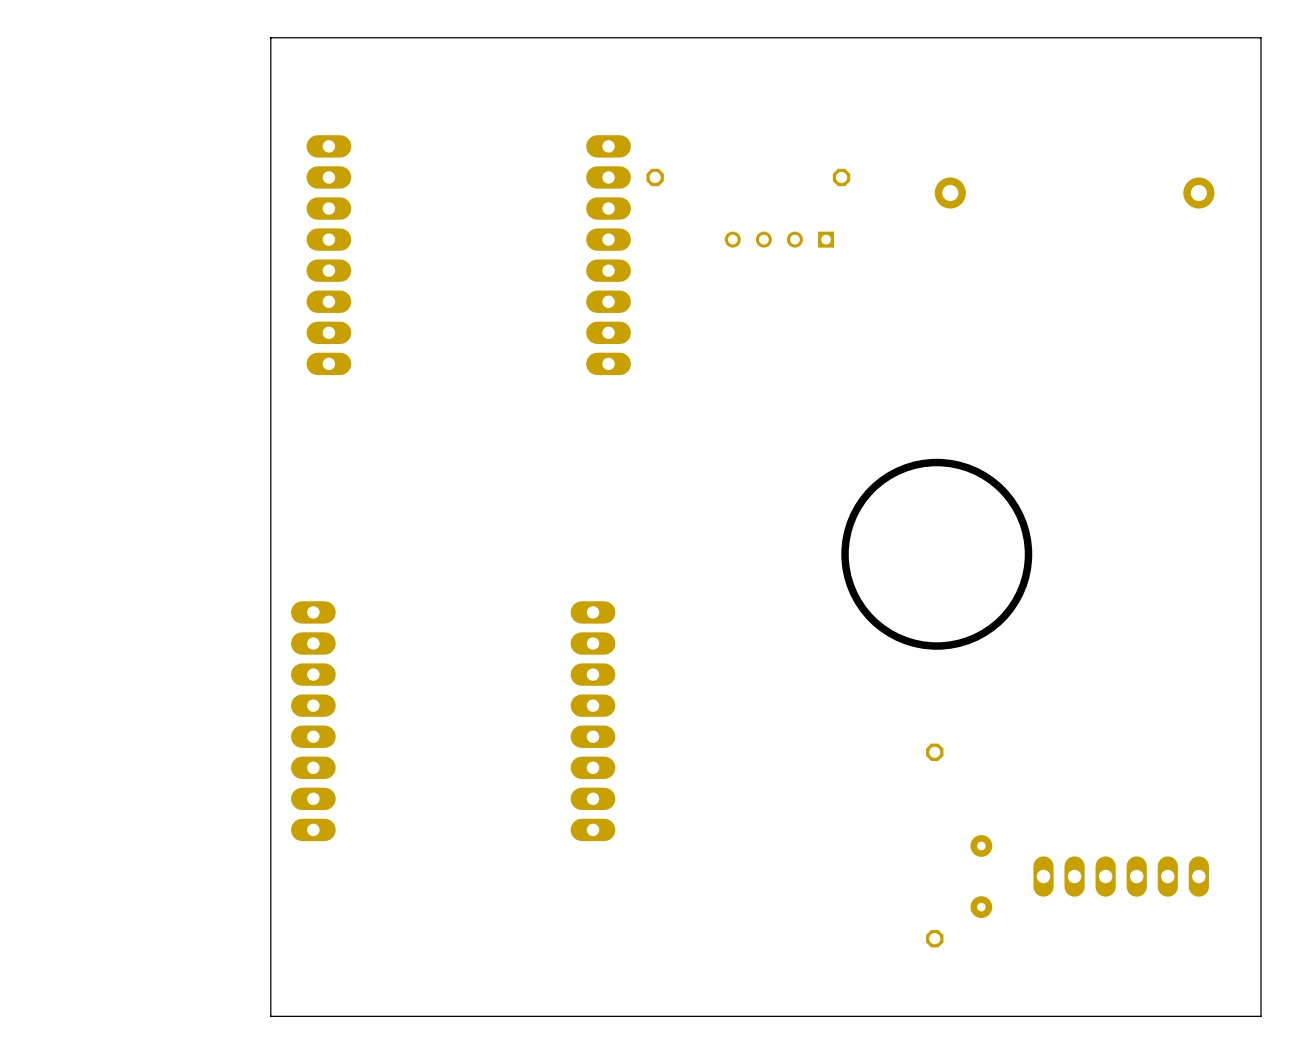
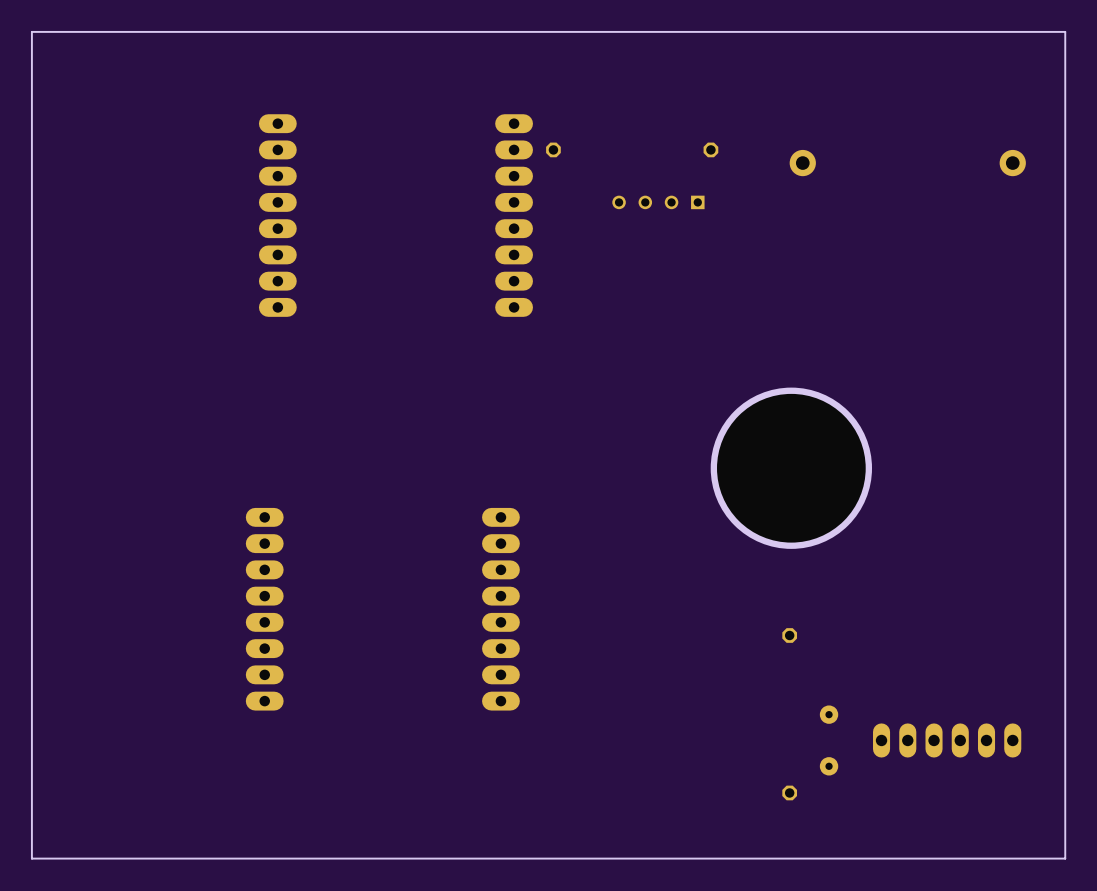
board edge: (270, 37) (270, 1016) -> (228, 31) (31, 31) (31, 858) (228, 858)

